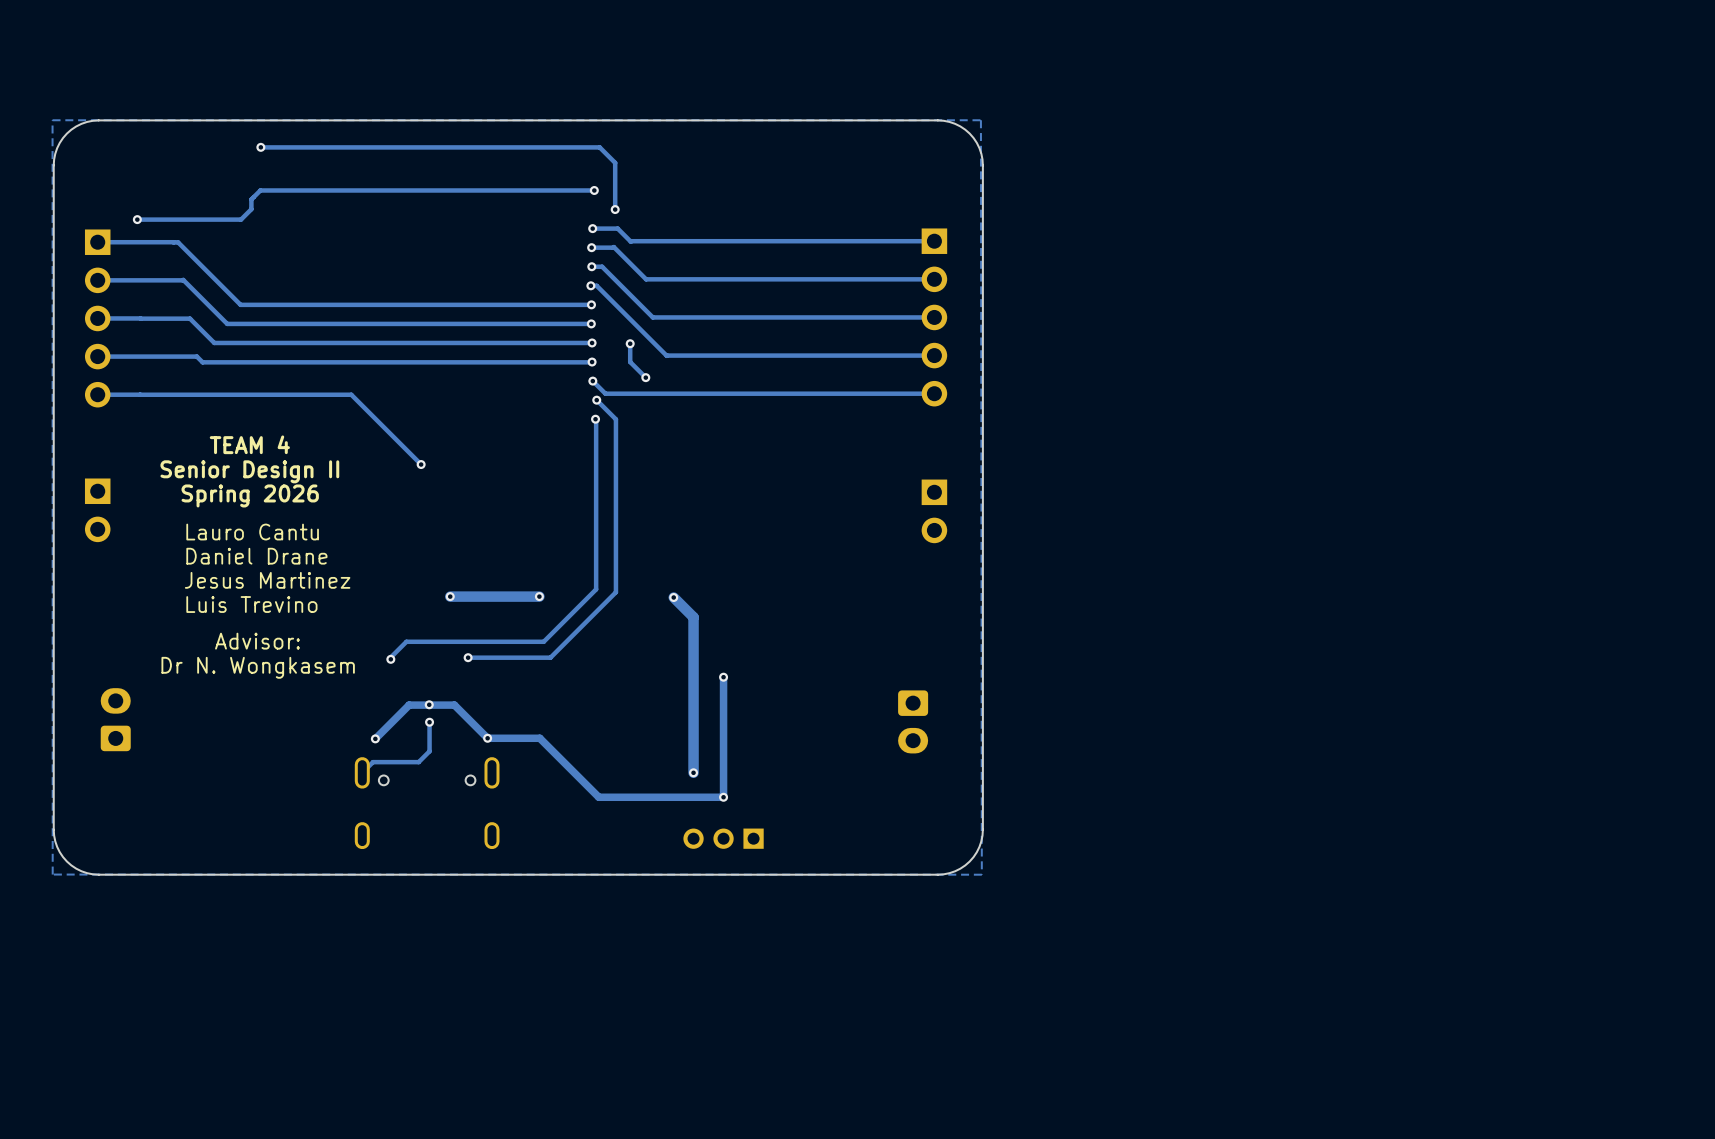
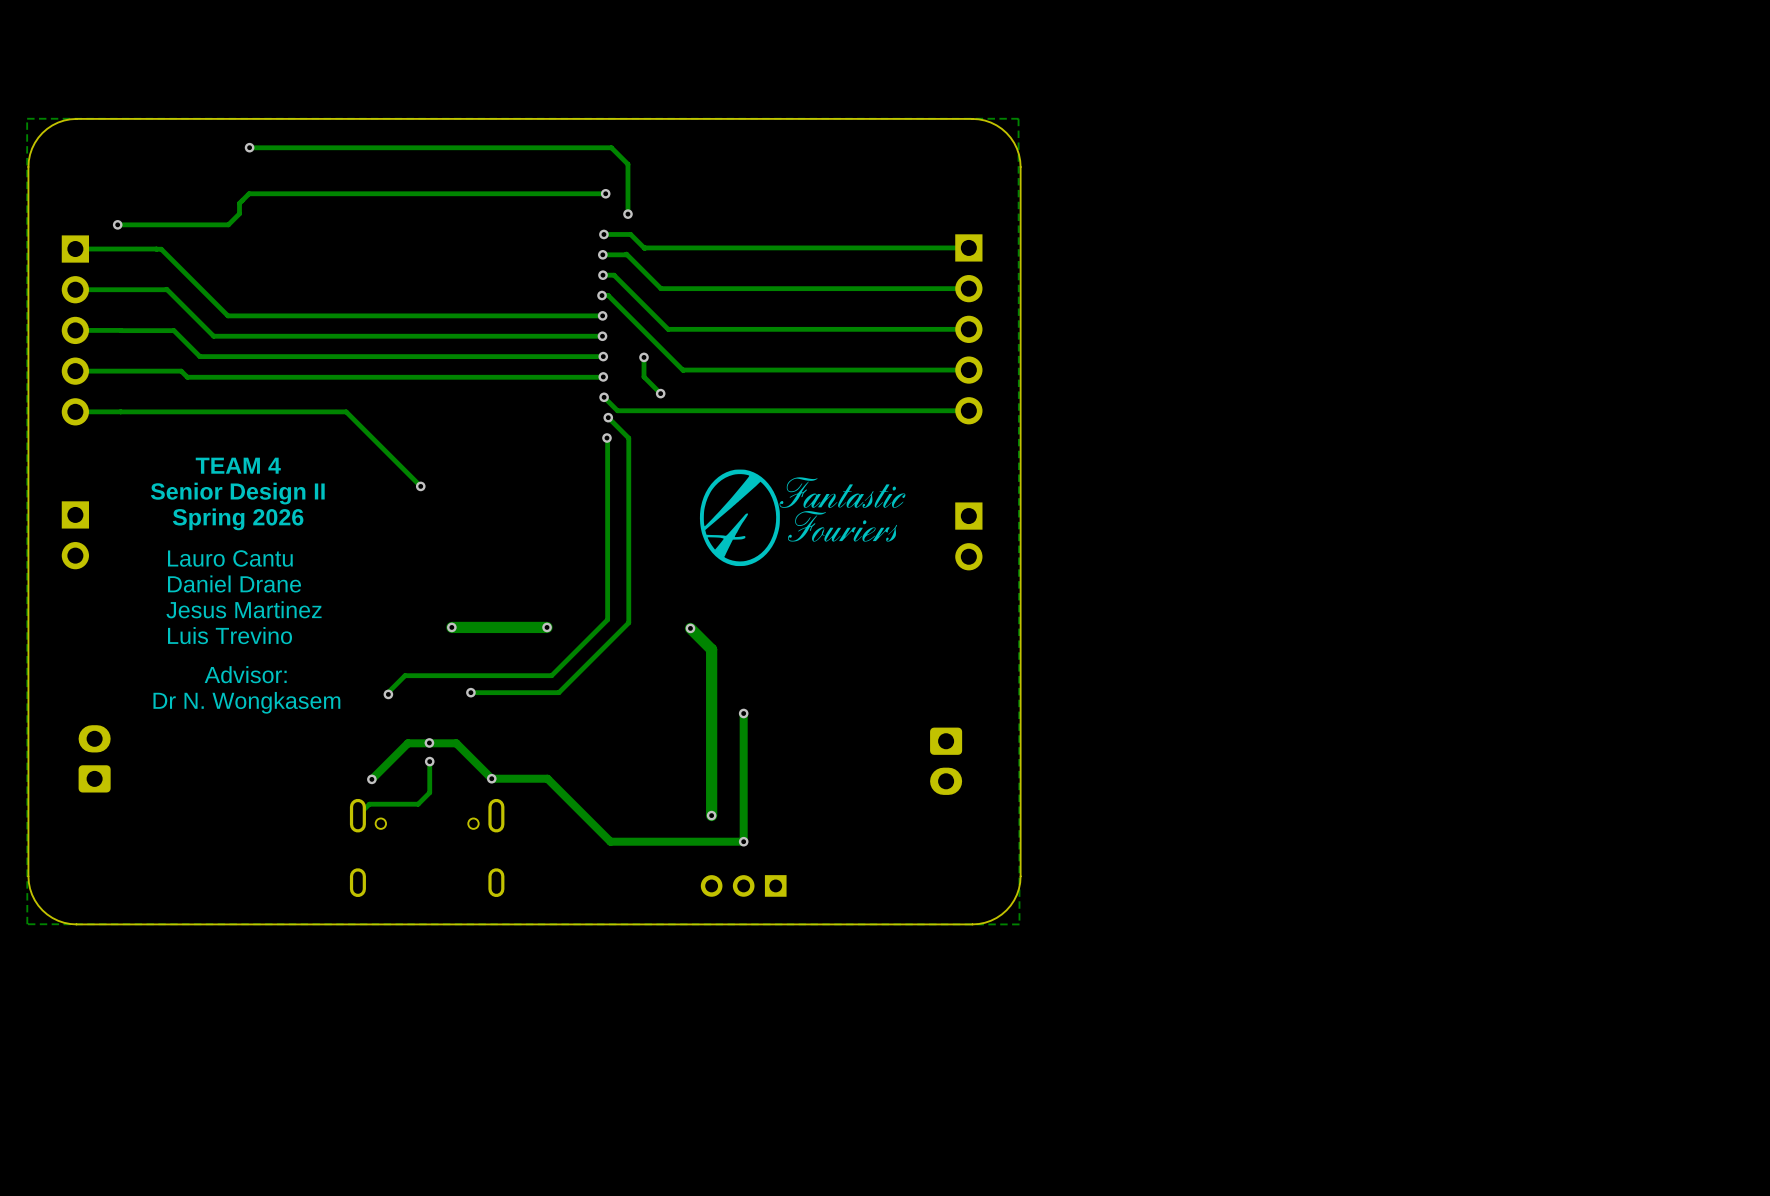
drawing: none -> [699, 469, 906, 567]

